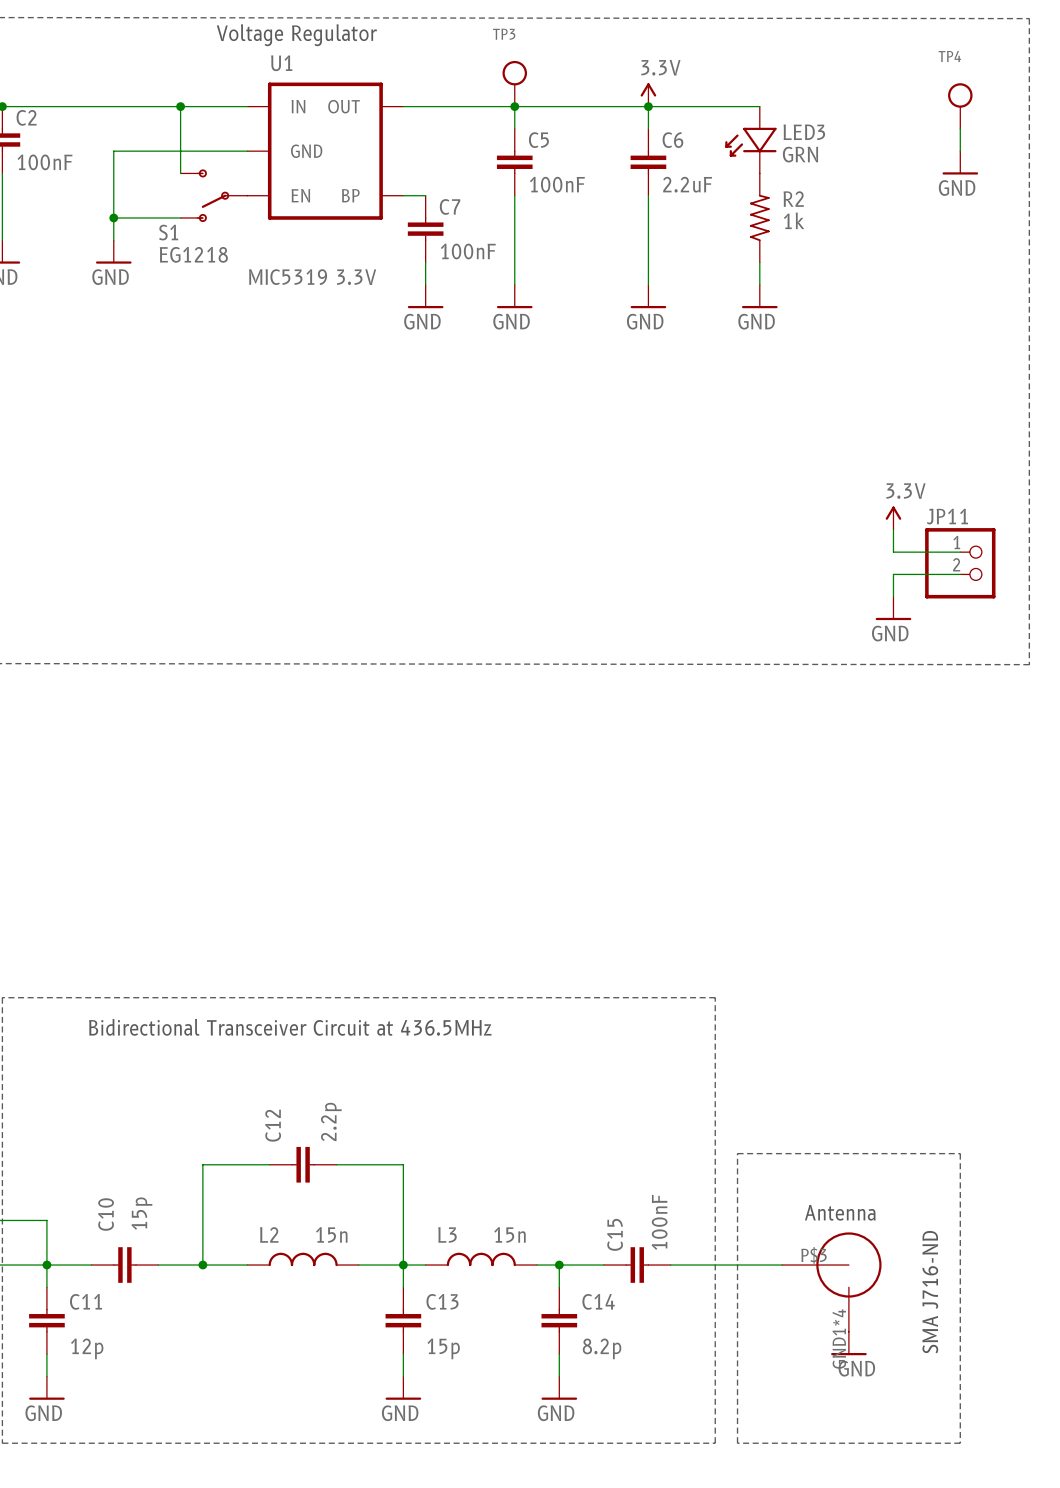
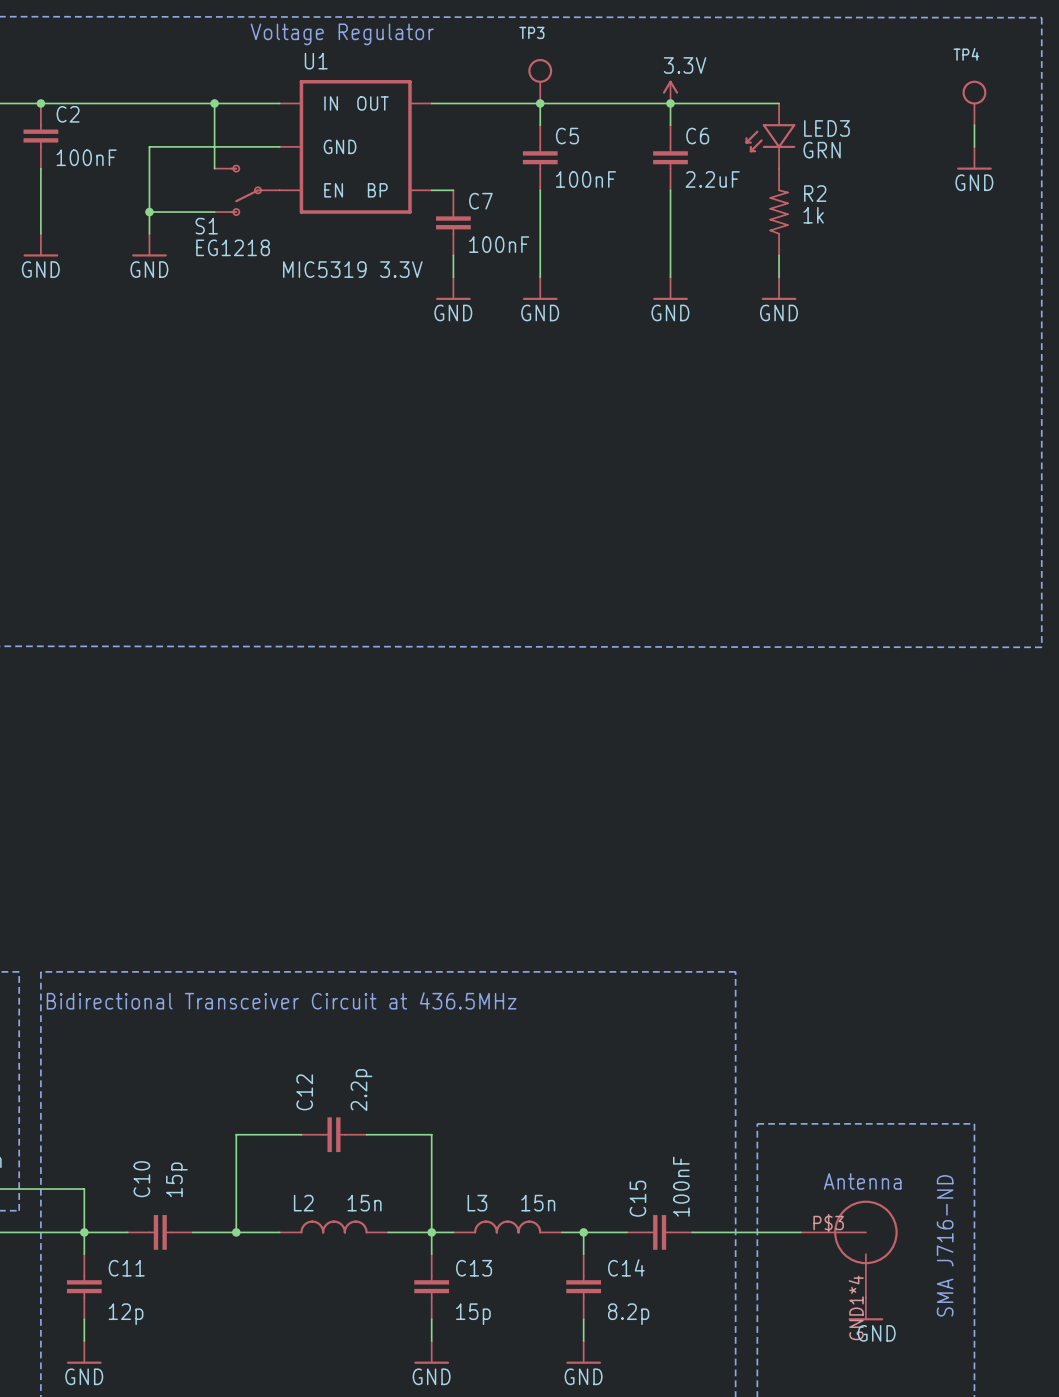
power symbol: 3.3V (893, 518) -> none
wire: (893, 529) (893, 552) (960, 552) -> none
JP11: (960, 563) -> none
wire: (960, 574) (893, 574) (893, 596) -> none
power symbol: GND (893, 608) -> none

